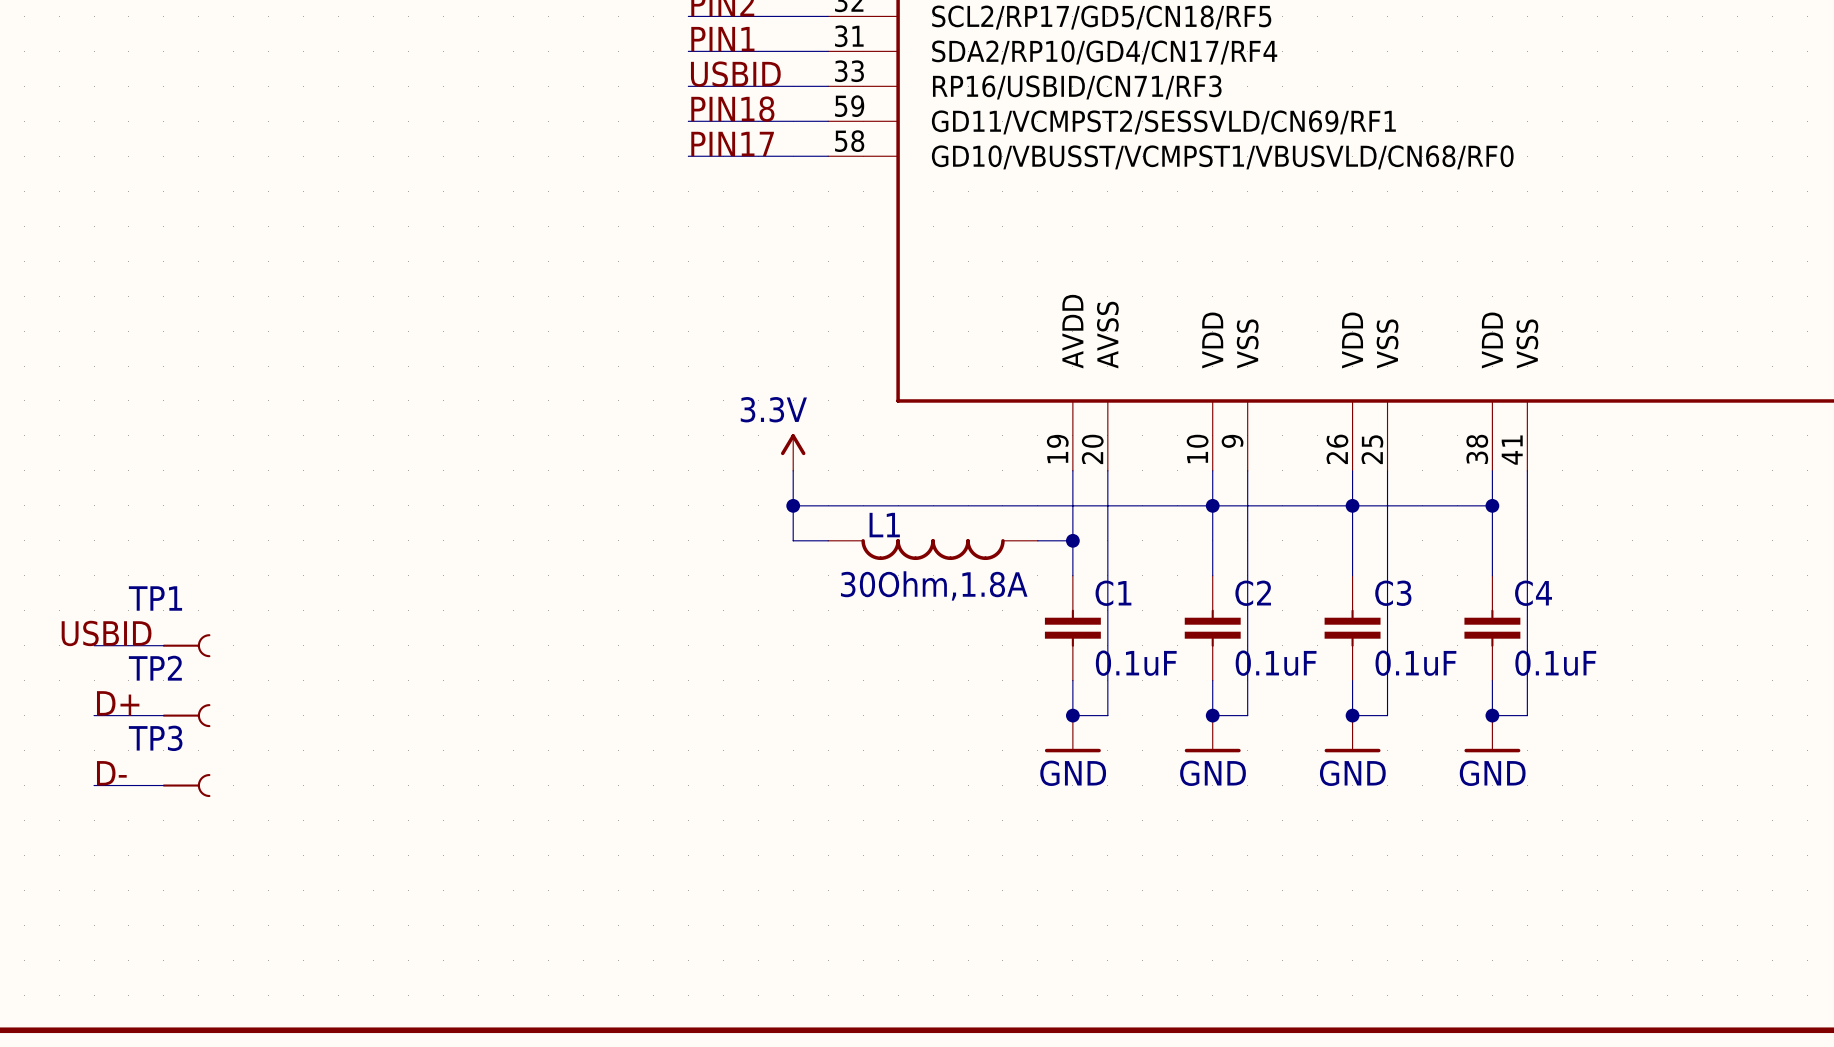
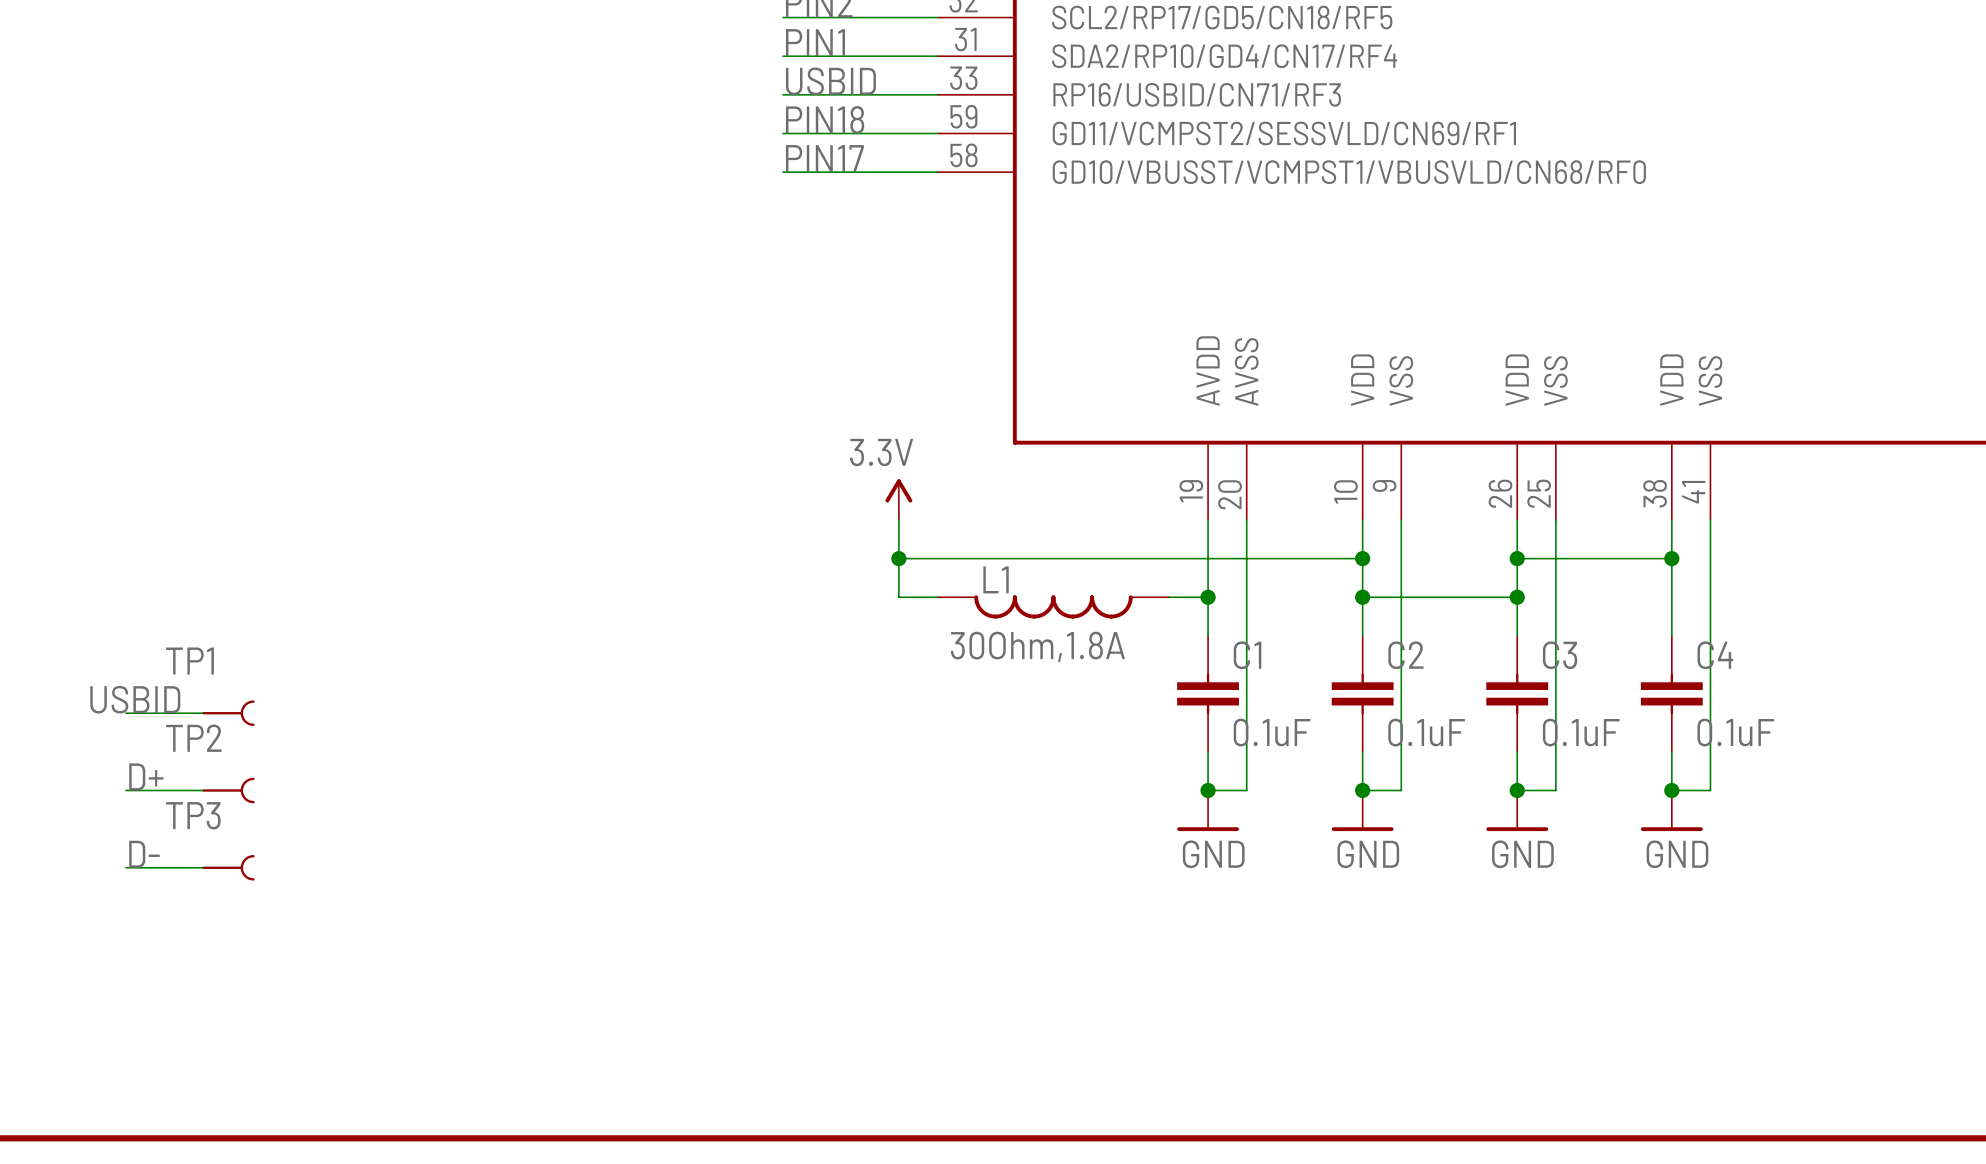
wire: (1212, 505) (1352, 505) -> (1362, 597) (1517, 597)
junction: none -> (1362, 597)
junction: none -> (1517, 597)

